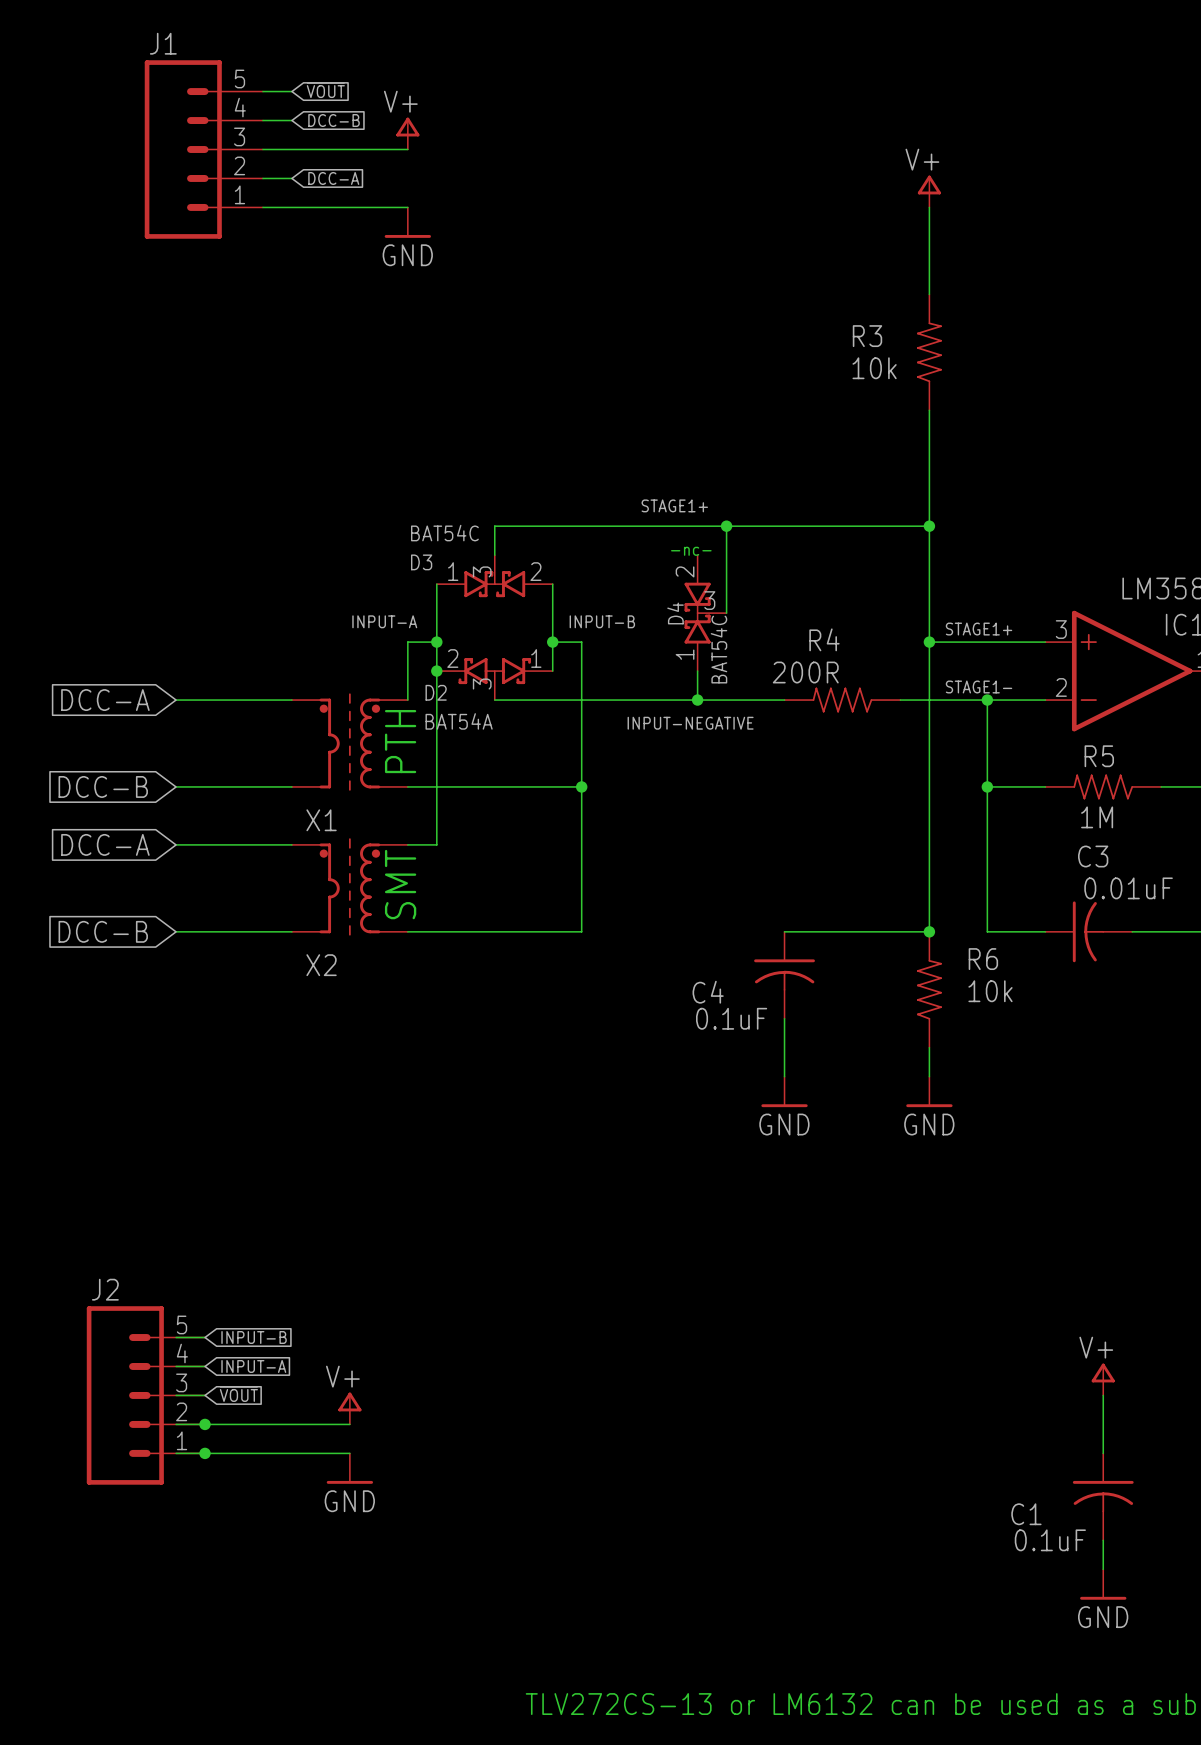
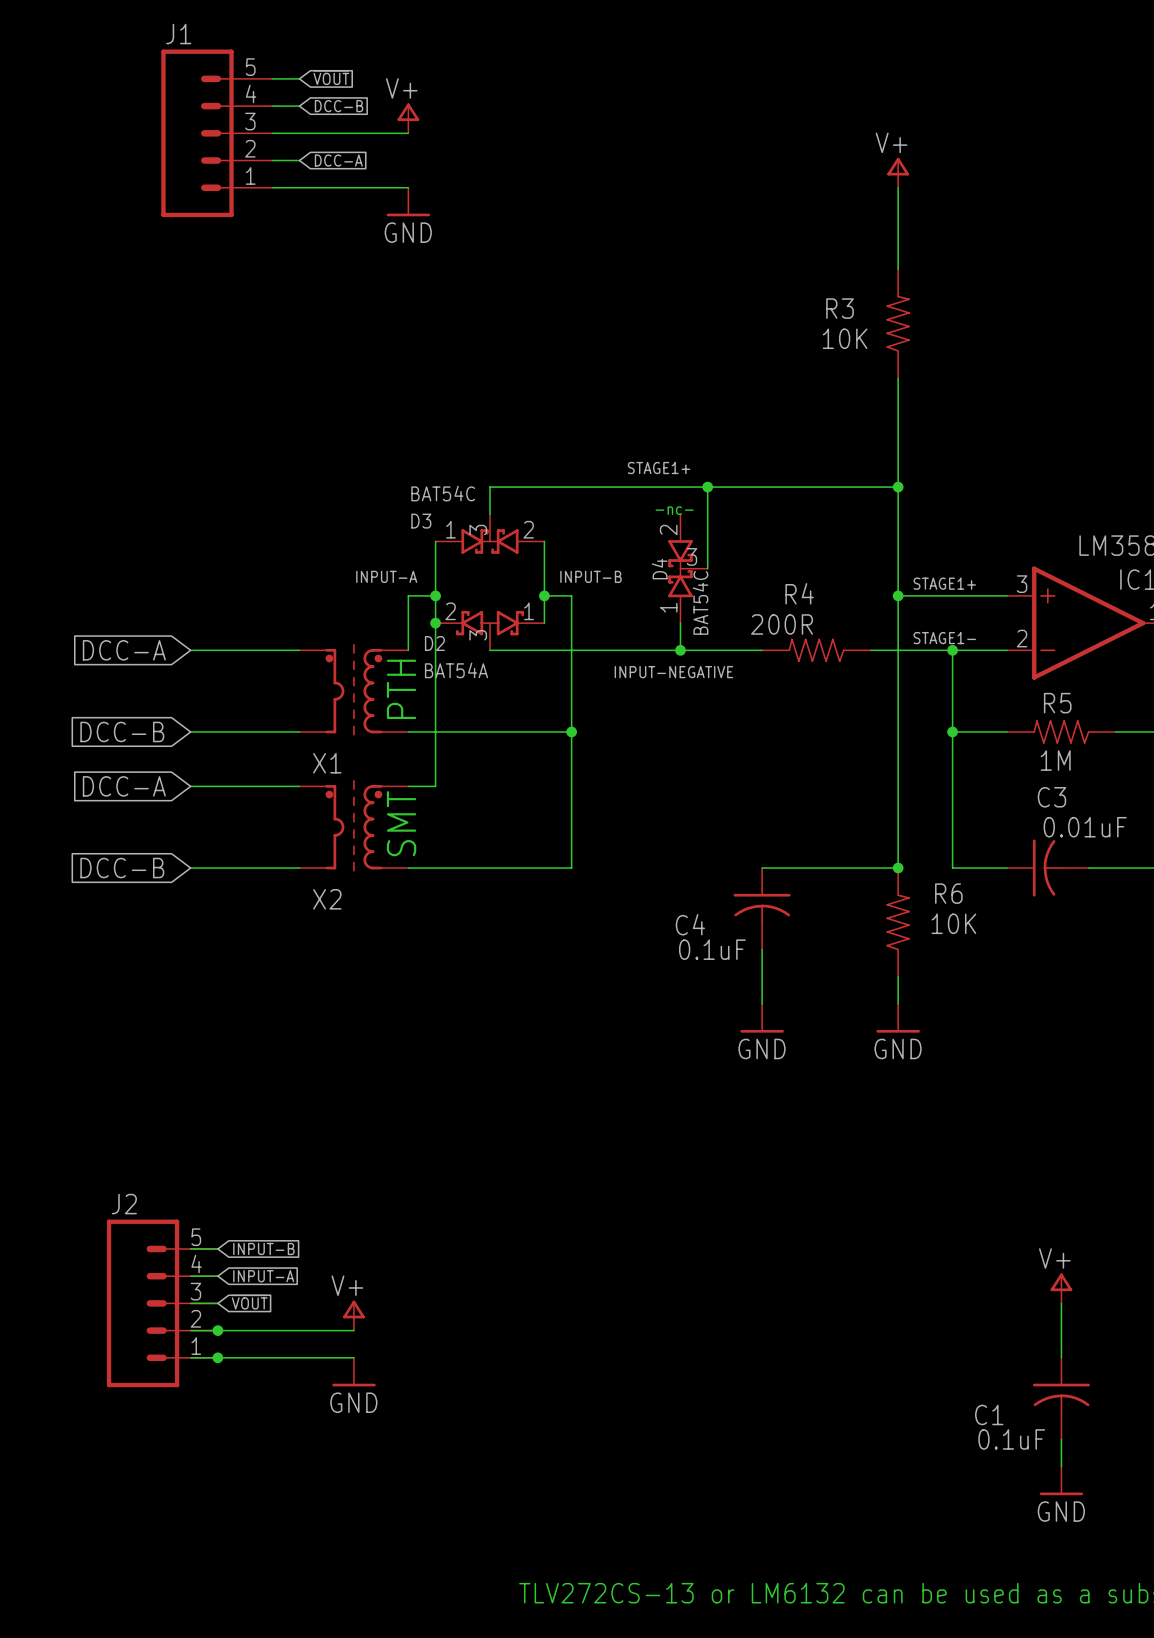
R3 value: 10k (874, 368) -> 10K (845, 338)
R6 value: 10k (990, 991) -> 10K (953, 923)

